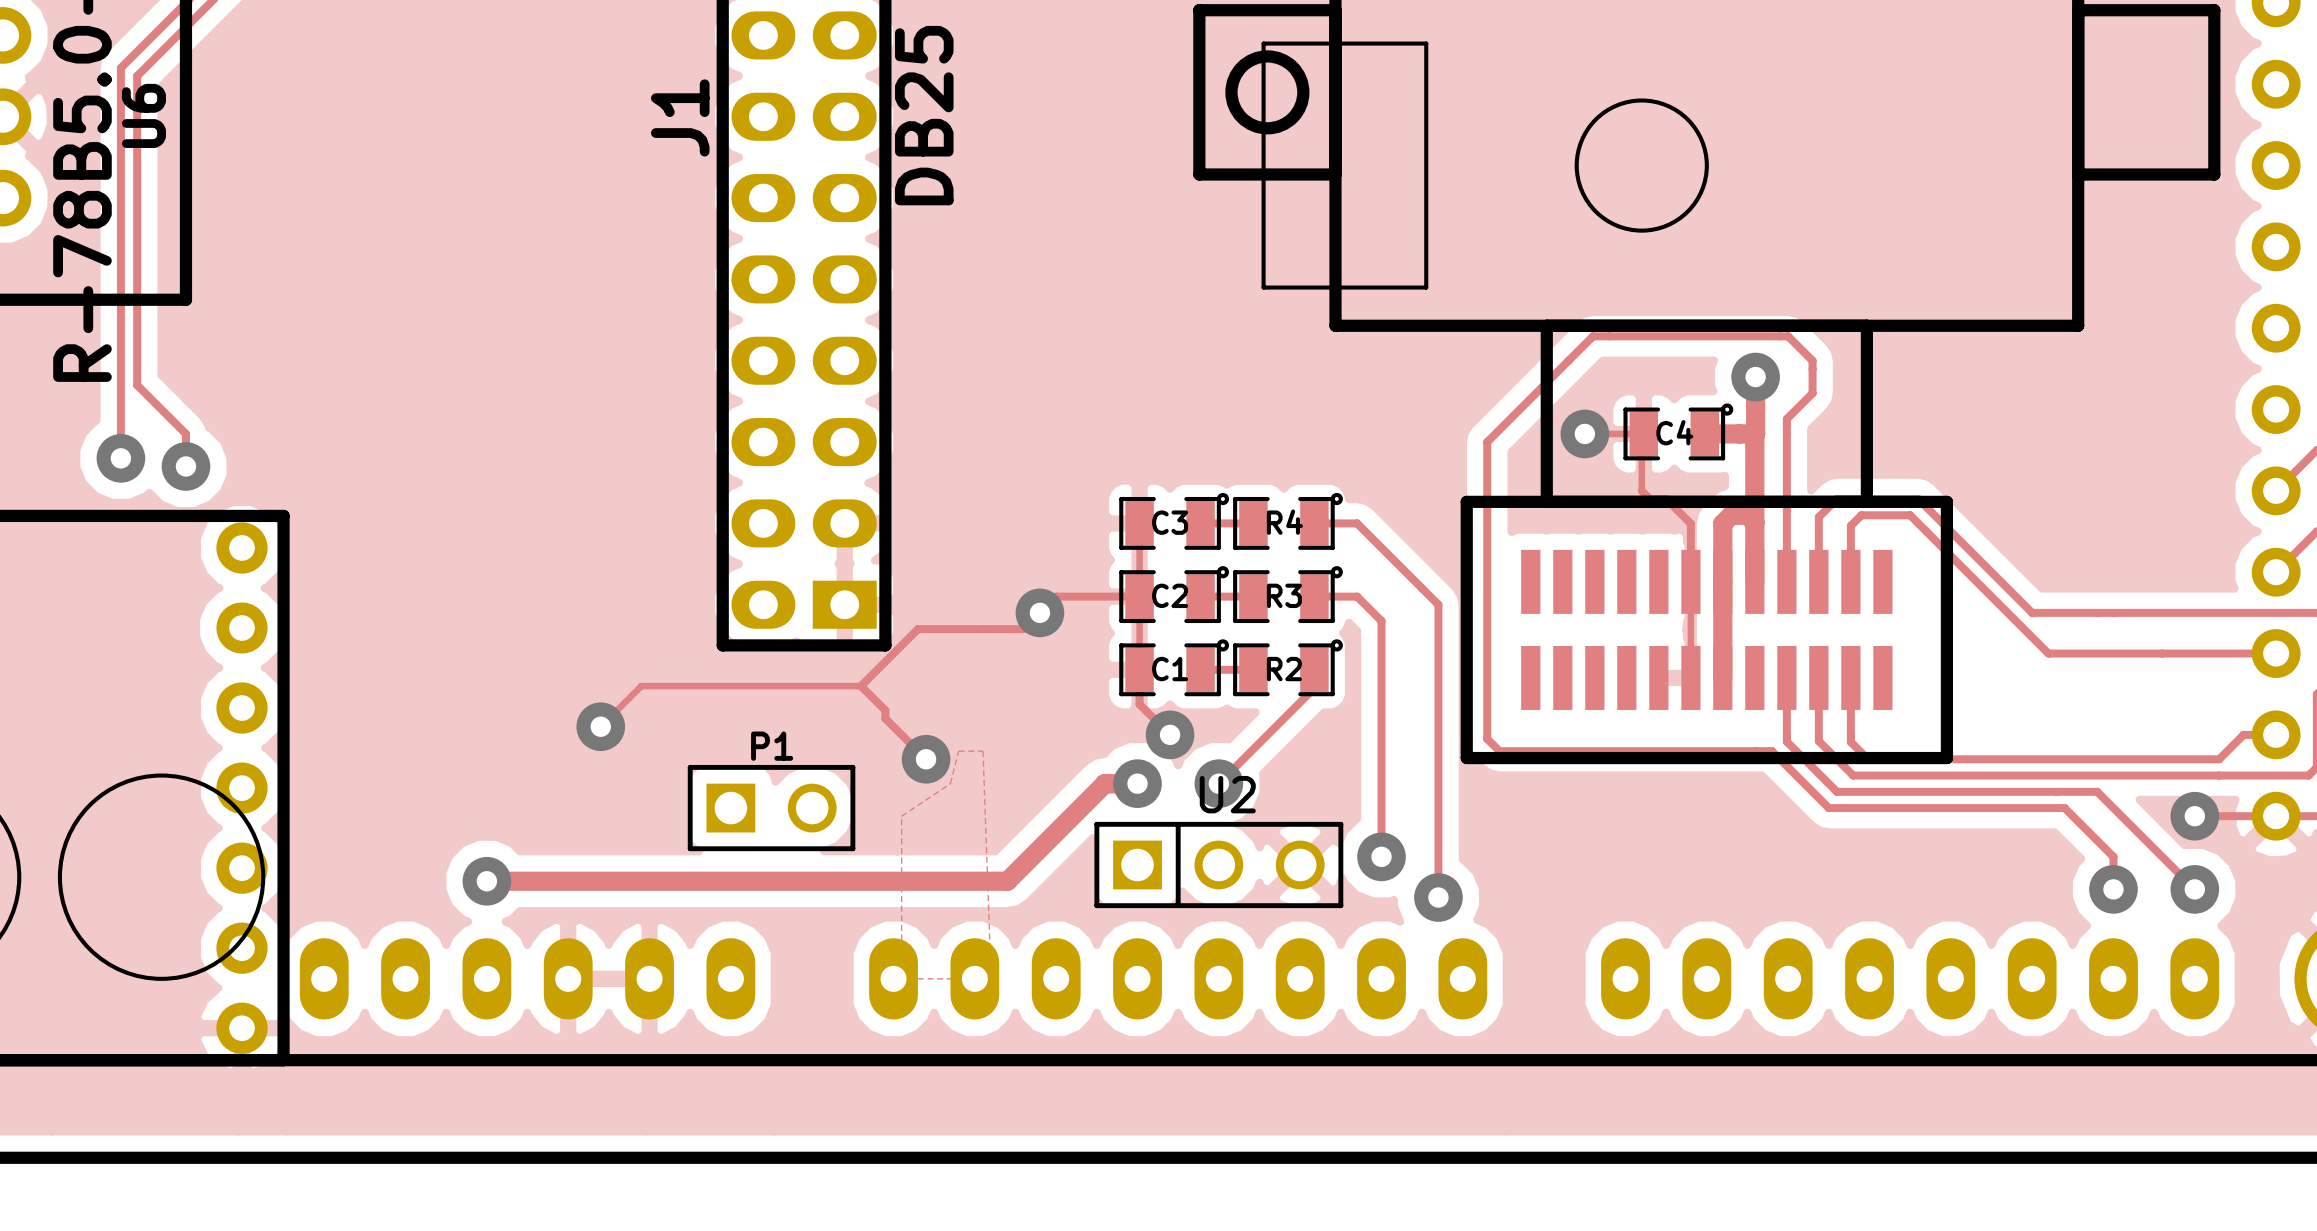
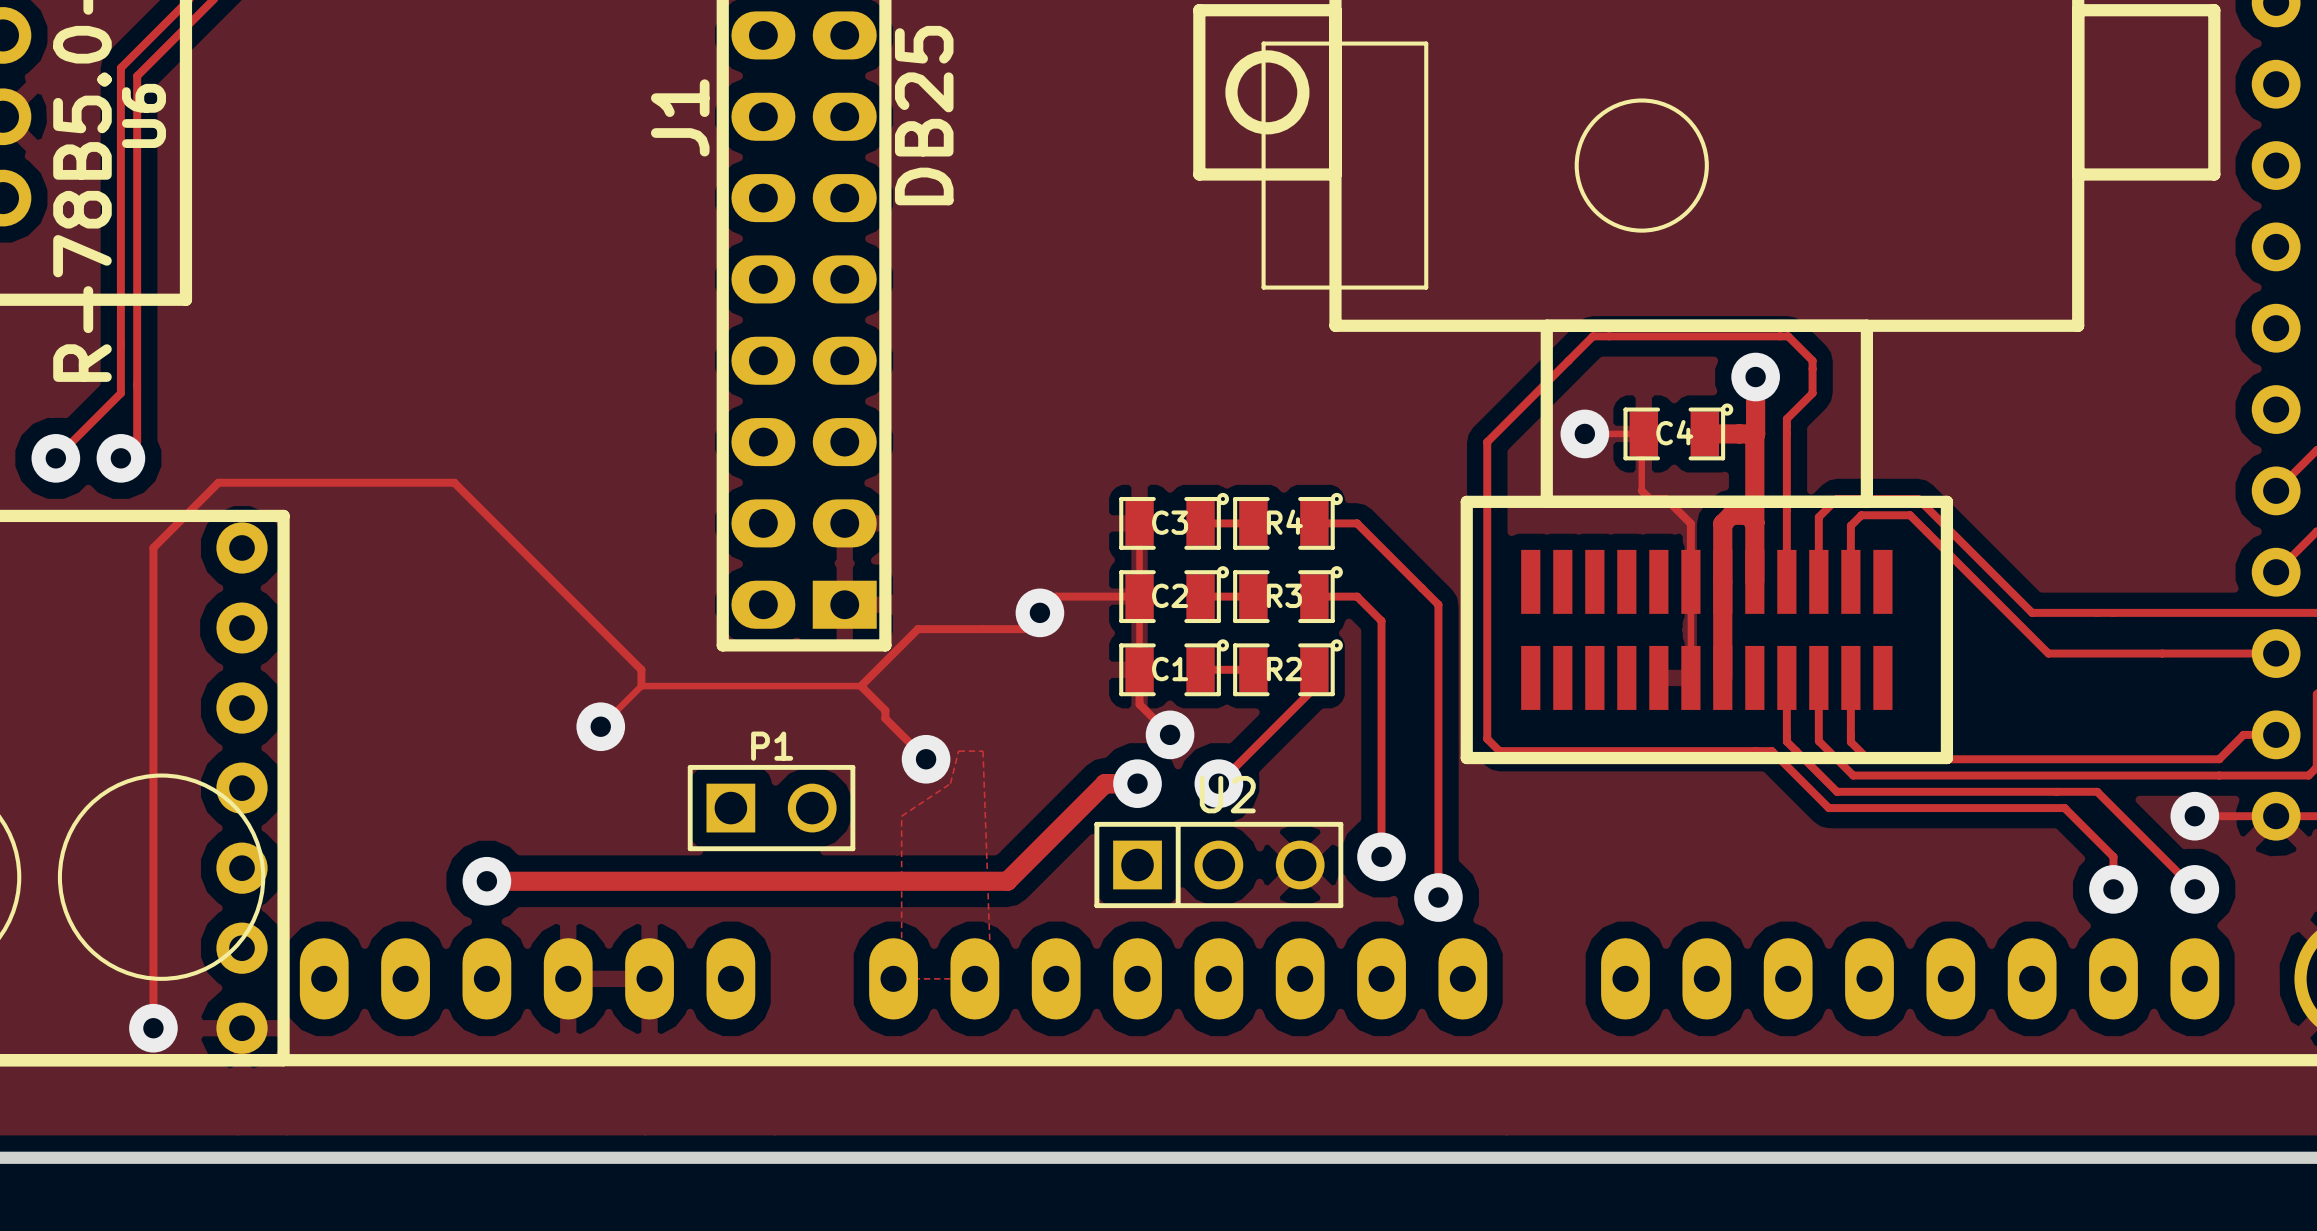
track: (137, 385) (185, 433) (185, 466) -> none
track: (120, 393) (120, 458) -> (137, 385) (137, 442) (120, 458)
track: none -> (120, 393) (55, 458)
via position: (185, 466) -> (55, 458)
track: none -> (641, 686) (641, 669) (454, 482) (218, 482) (153, 547) (153, 1028)
via: none -> (153, 1028)

